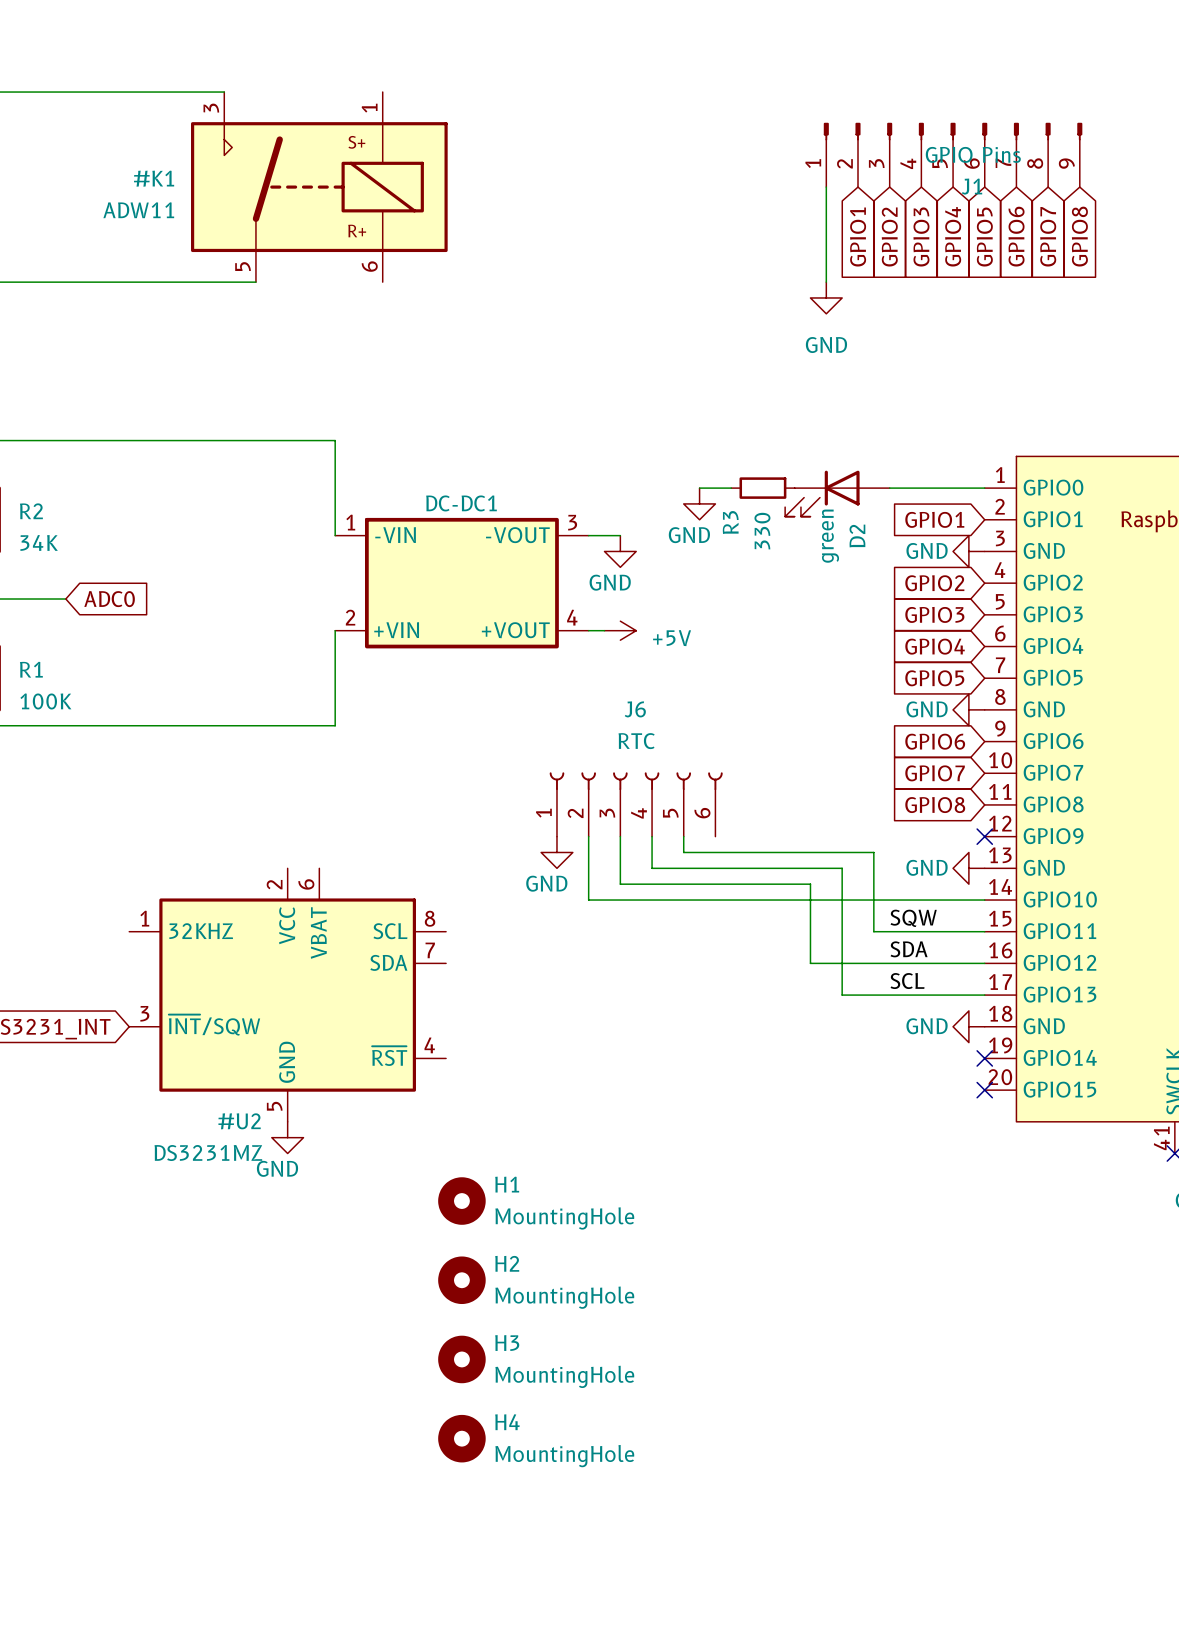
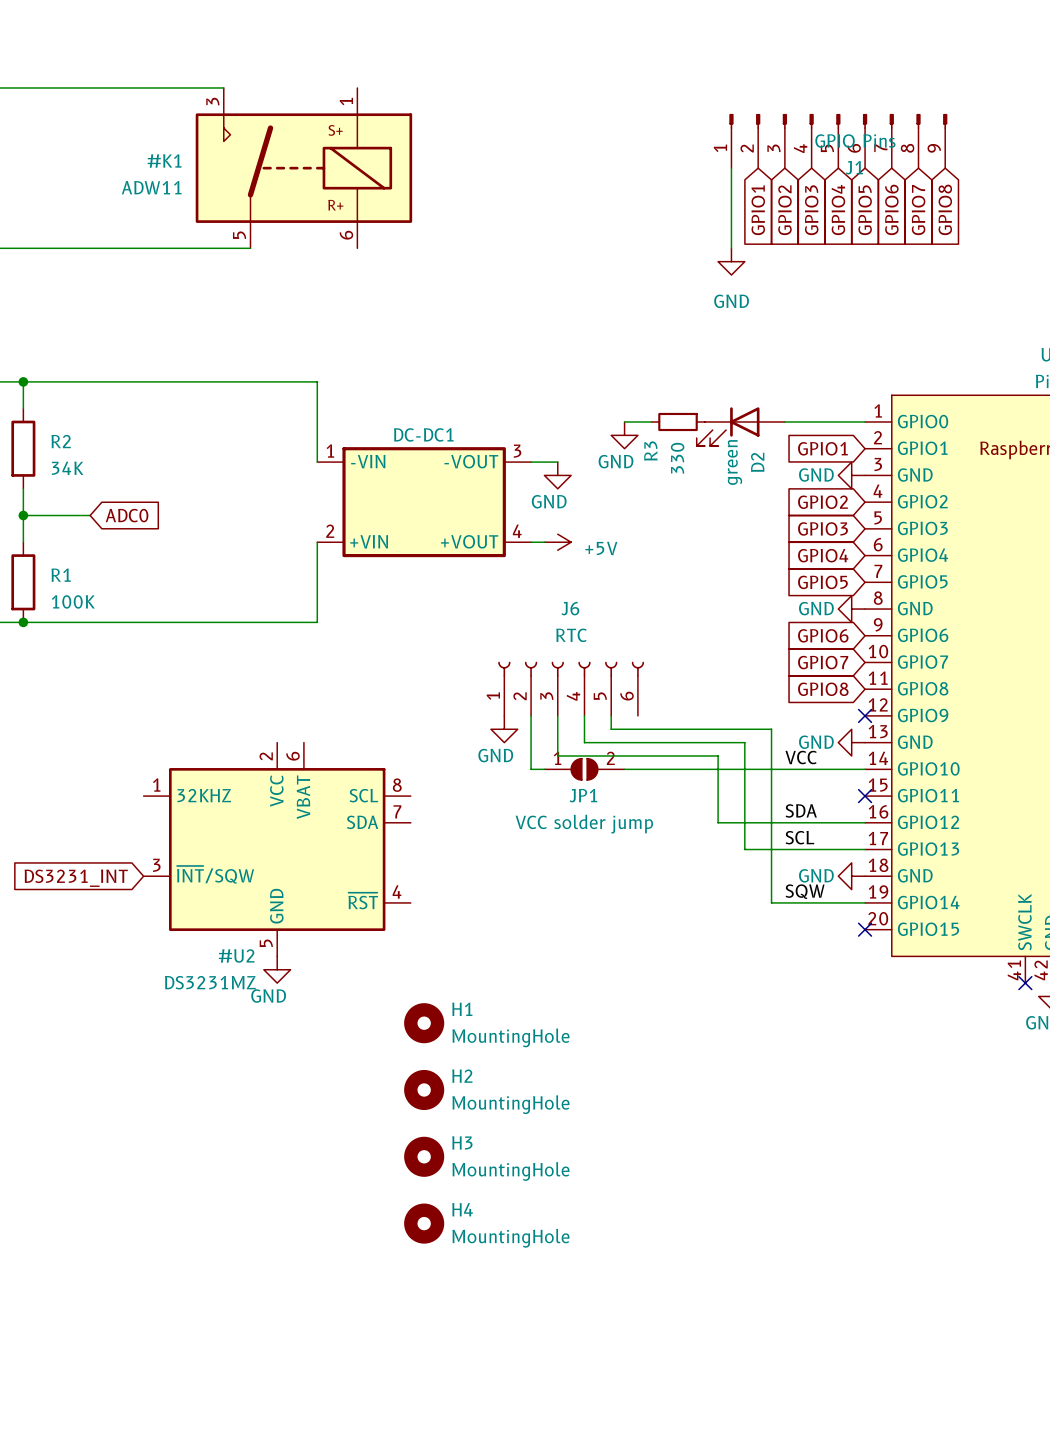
label: none -> VCC (801, 757)
JP1: none -> VCC solder jump (584, 769)
label position: SQW (913, 918) -> SQW (805, 891)
wire: (873, 931) (984, 931) -> (771, 796) (771, 902) (865, 902)
no-connect mark: none -> (865, 796)
no-connect mark: (984, 1058) -> none

